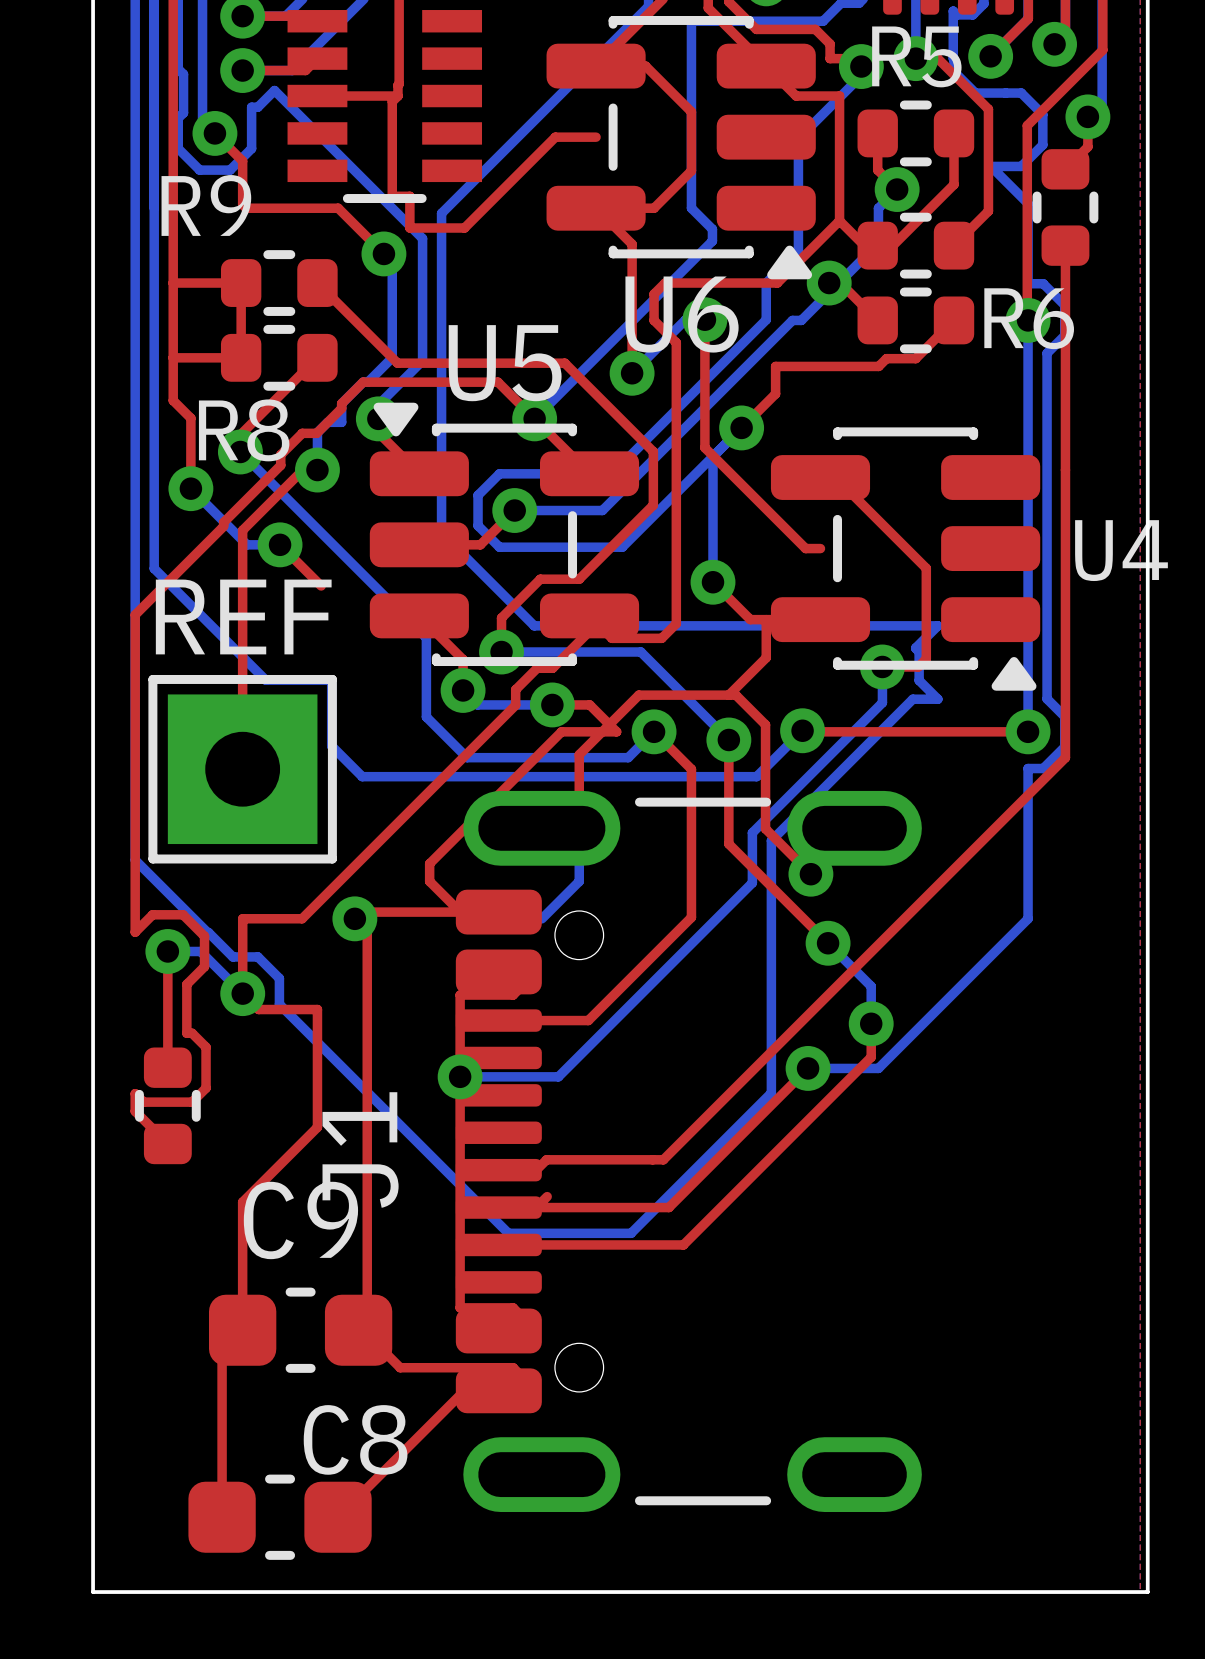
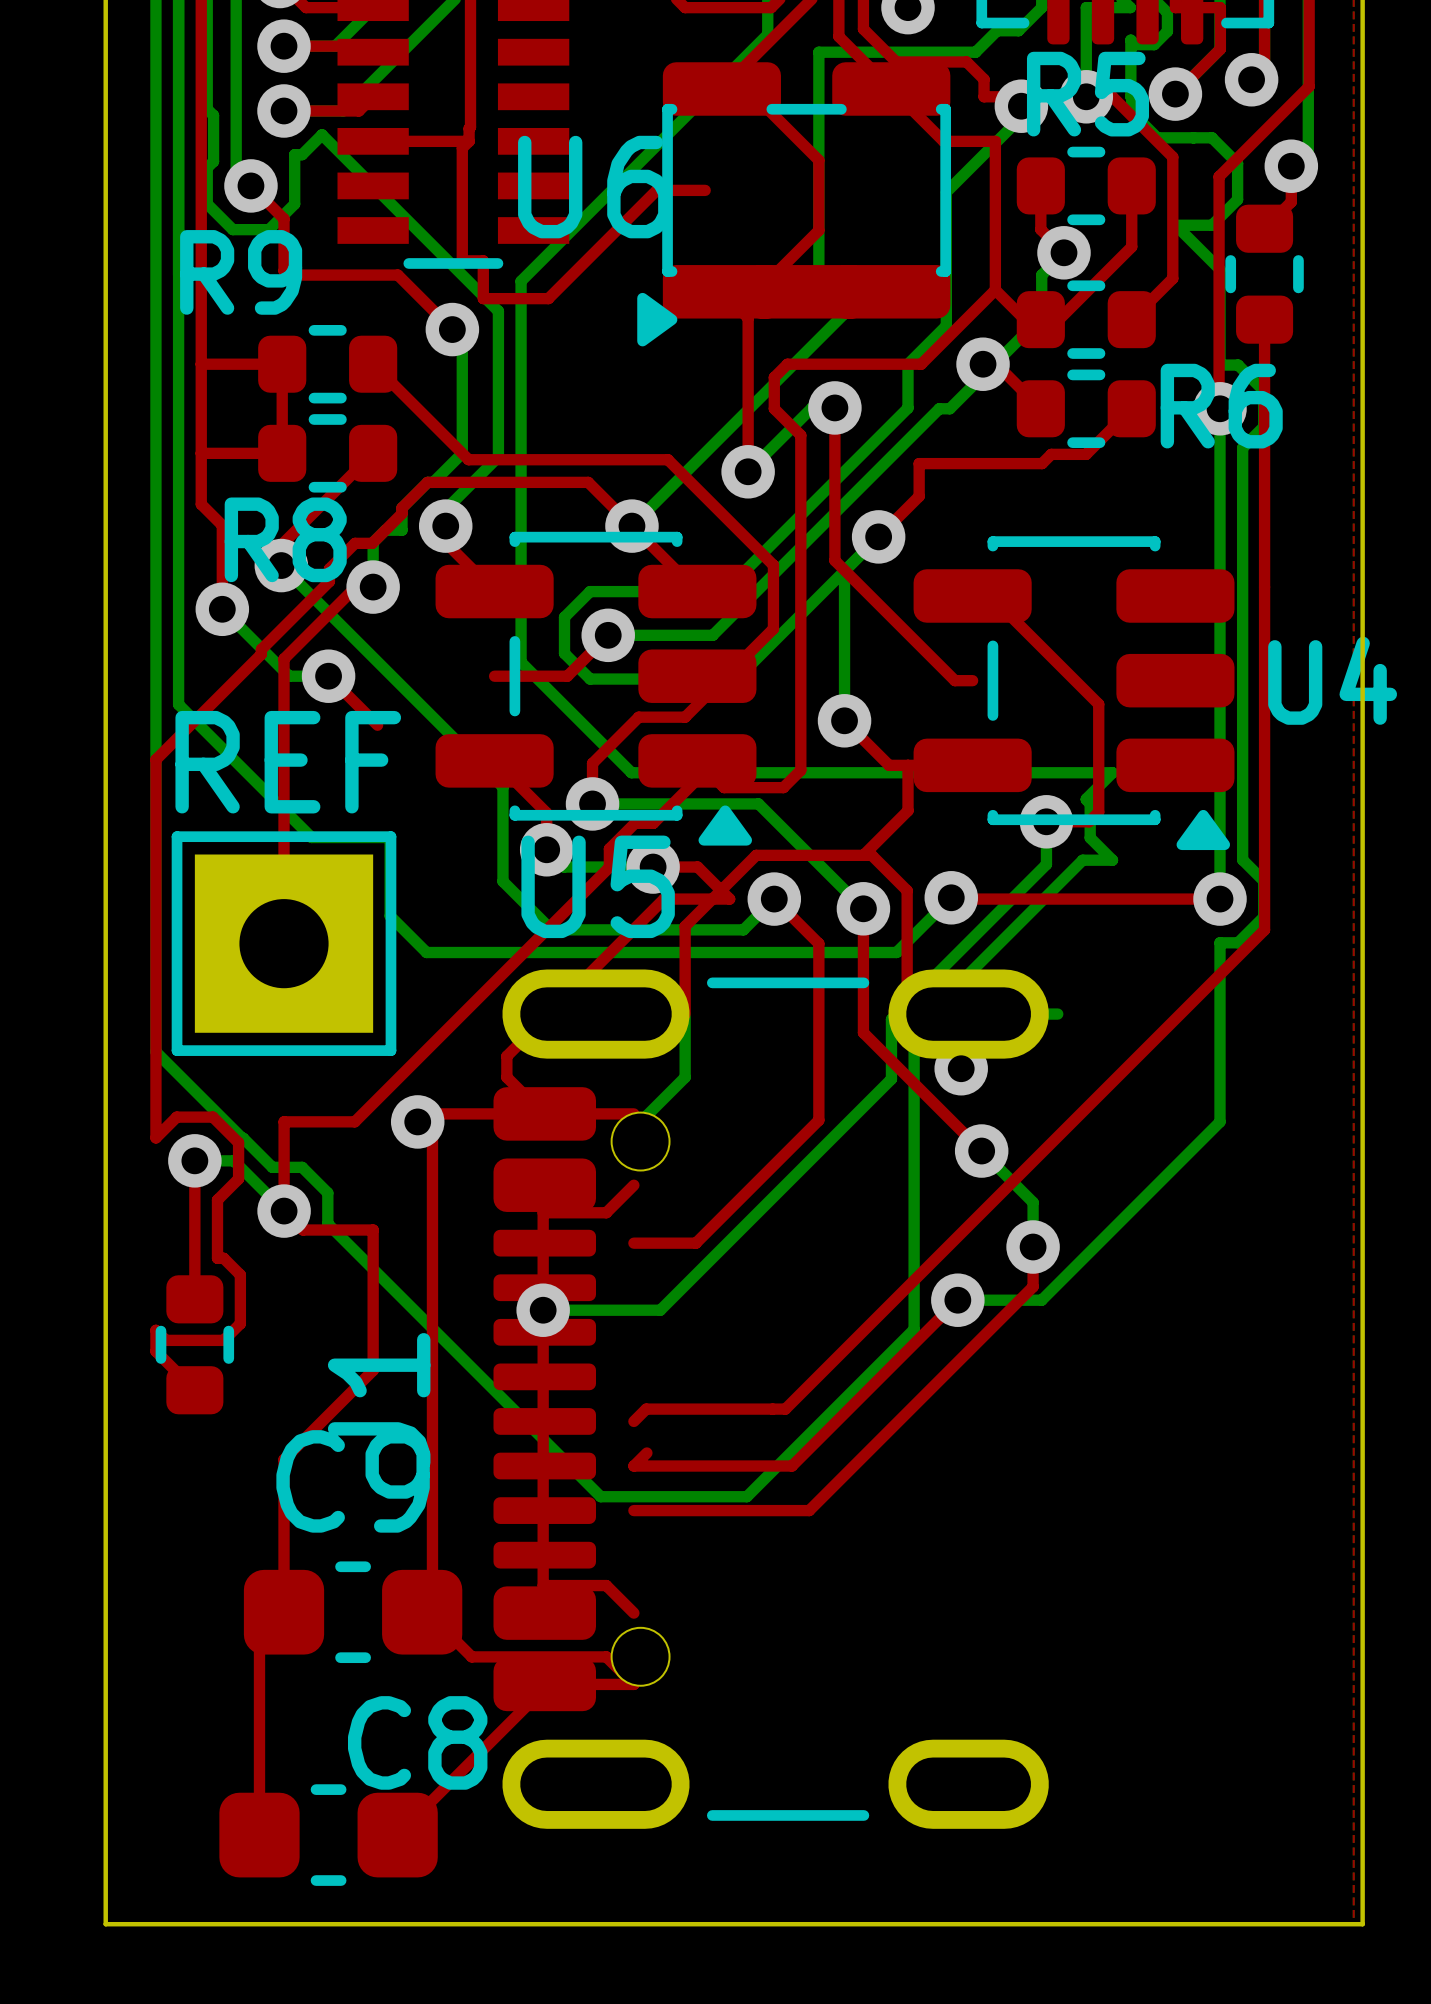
U6 footprint: [546, 15, 816, 280] -> [637, 62, 952, 347]
U6 name position: U6 (682, 314) -> U6 (594, 187)
U5 rotation: 0° (504, 534) -> 180° (596, 688)
J1 position: (688, 1151) -> (771, 1399)

